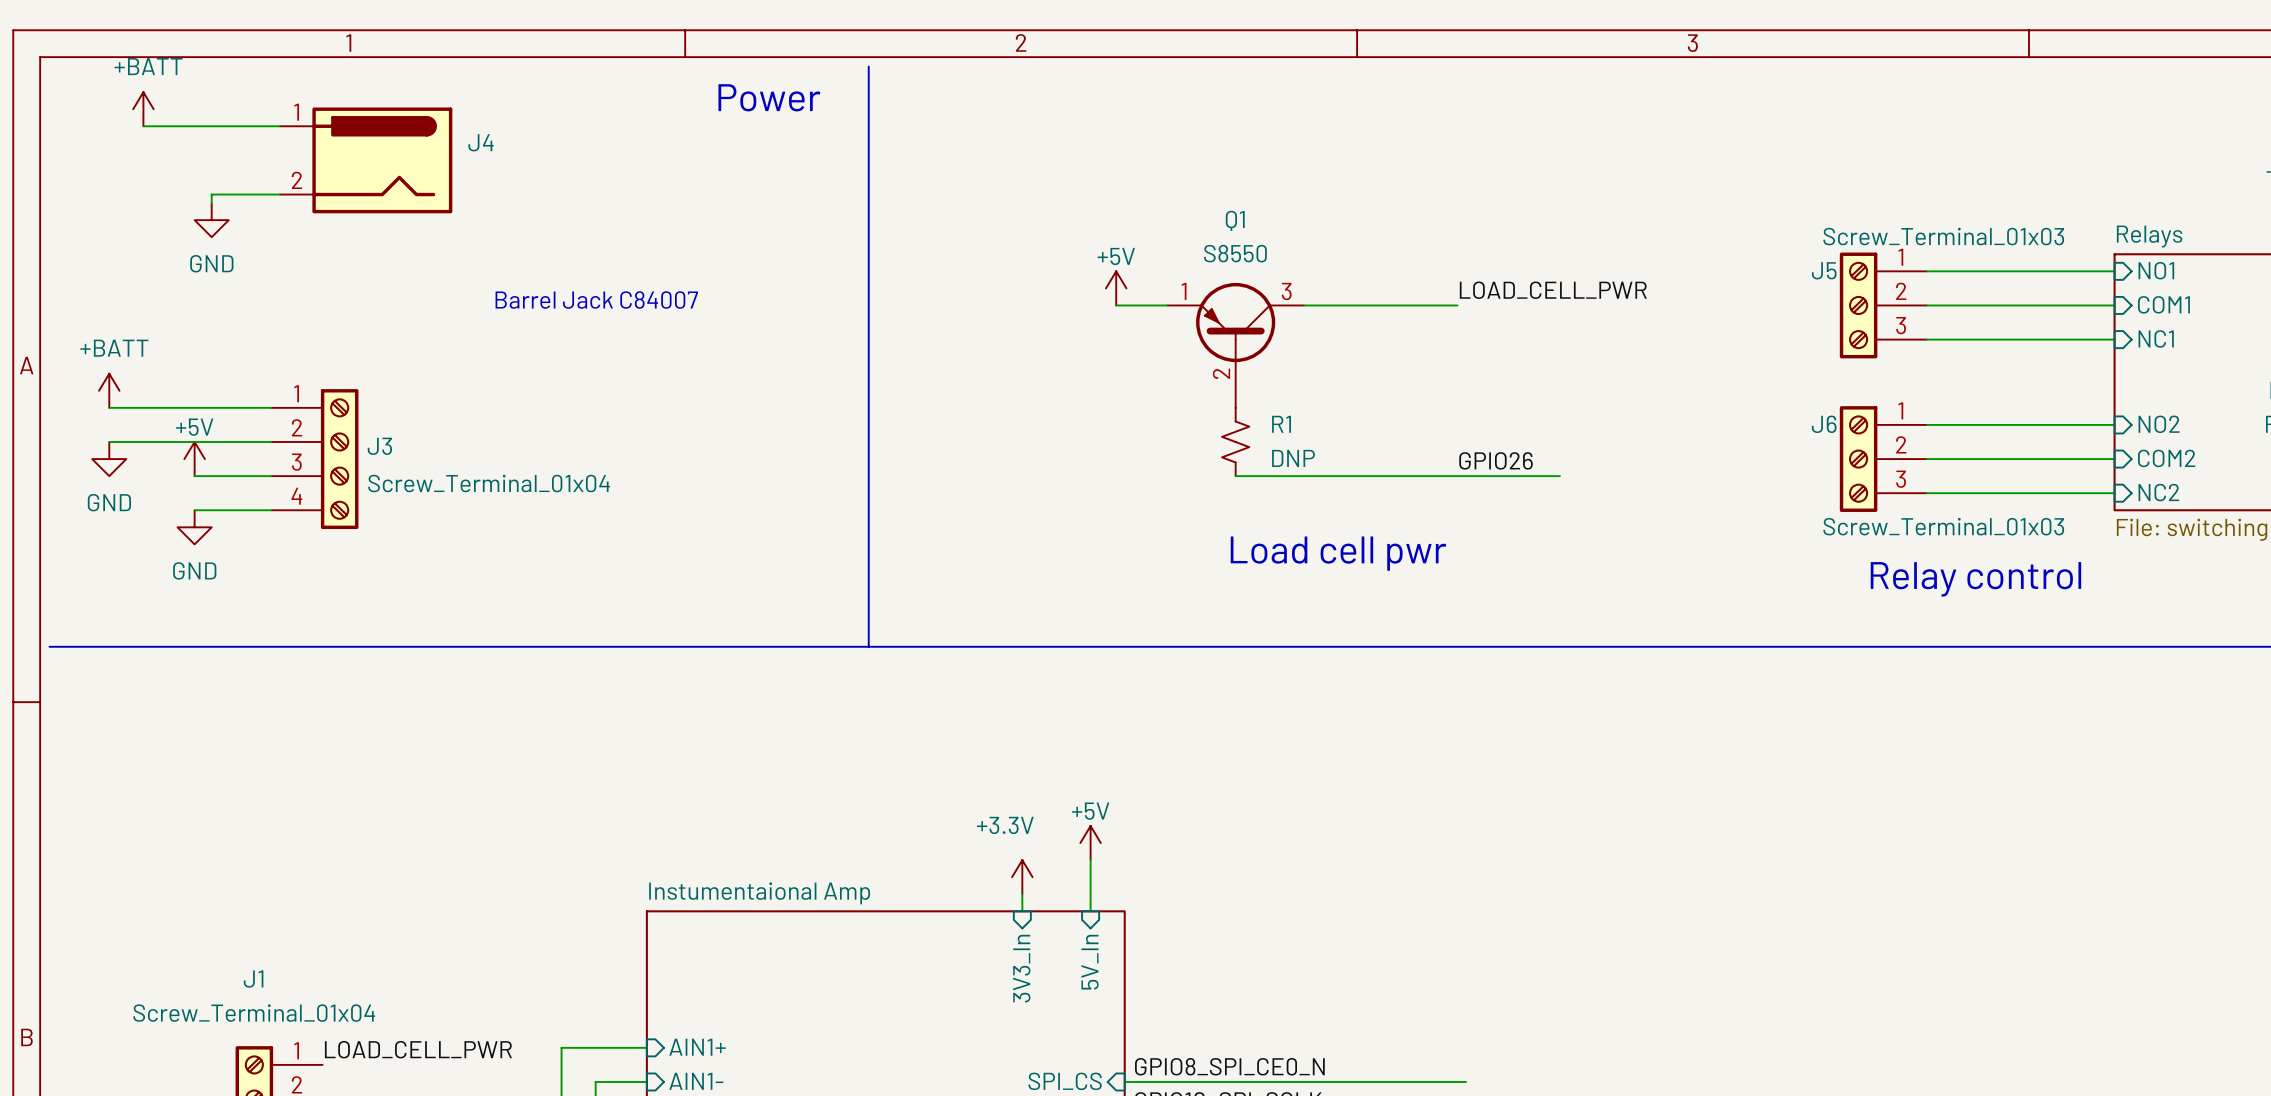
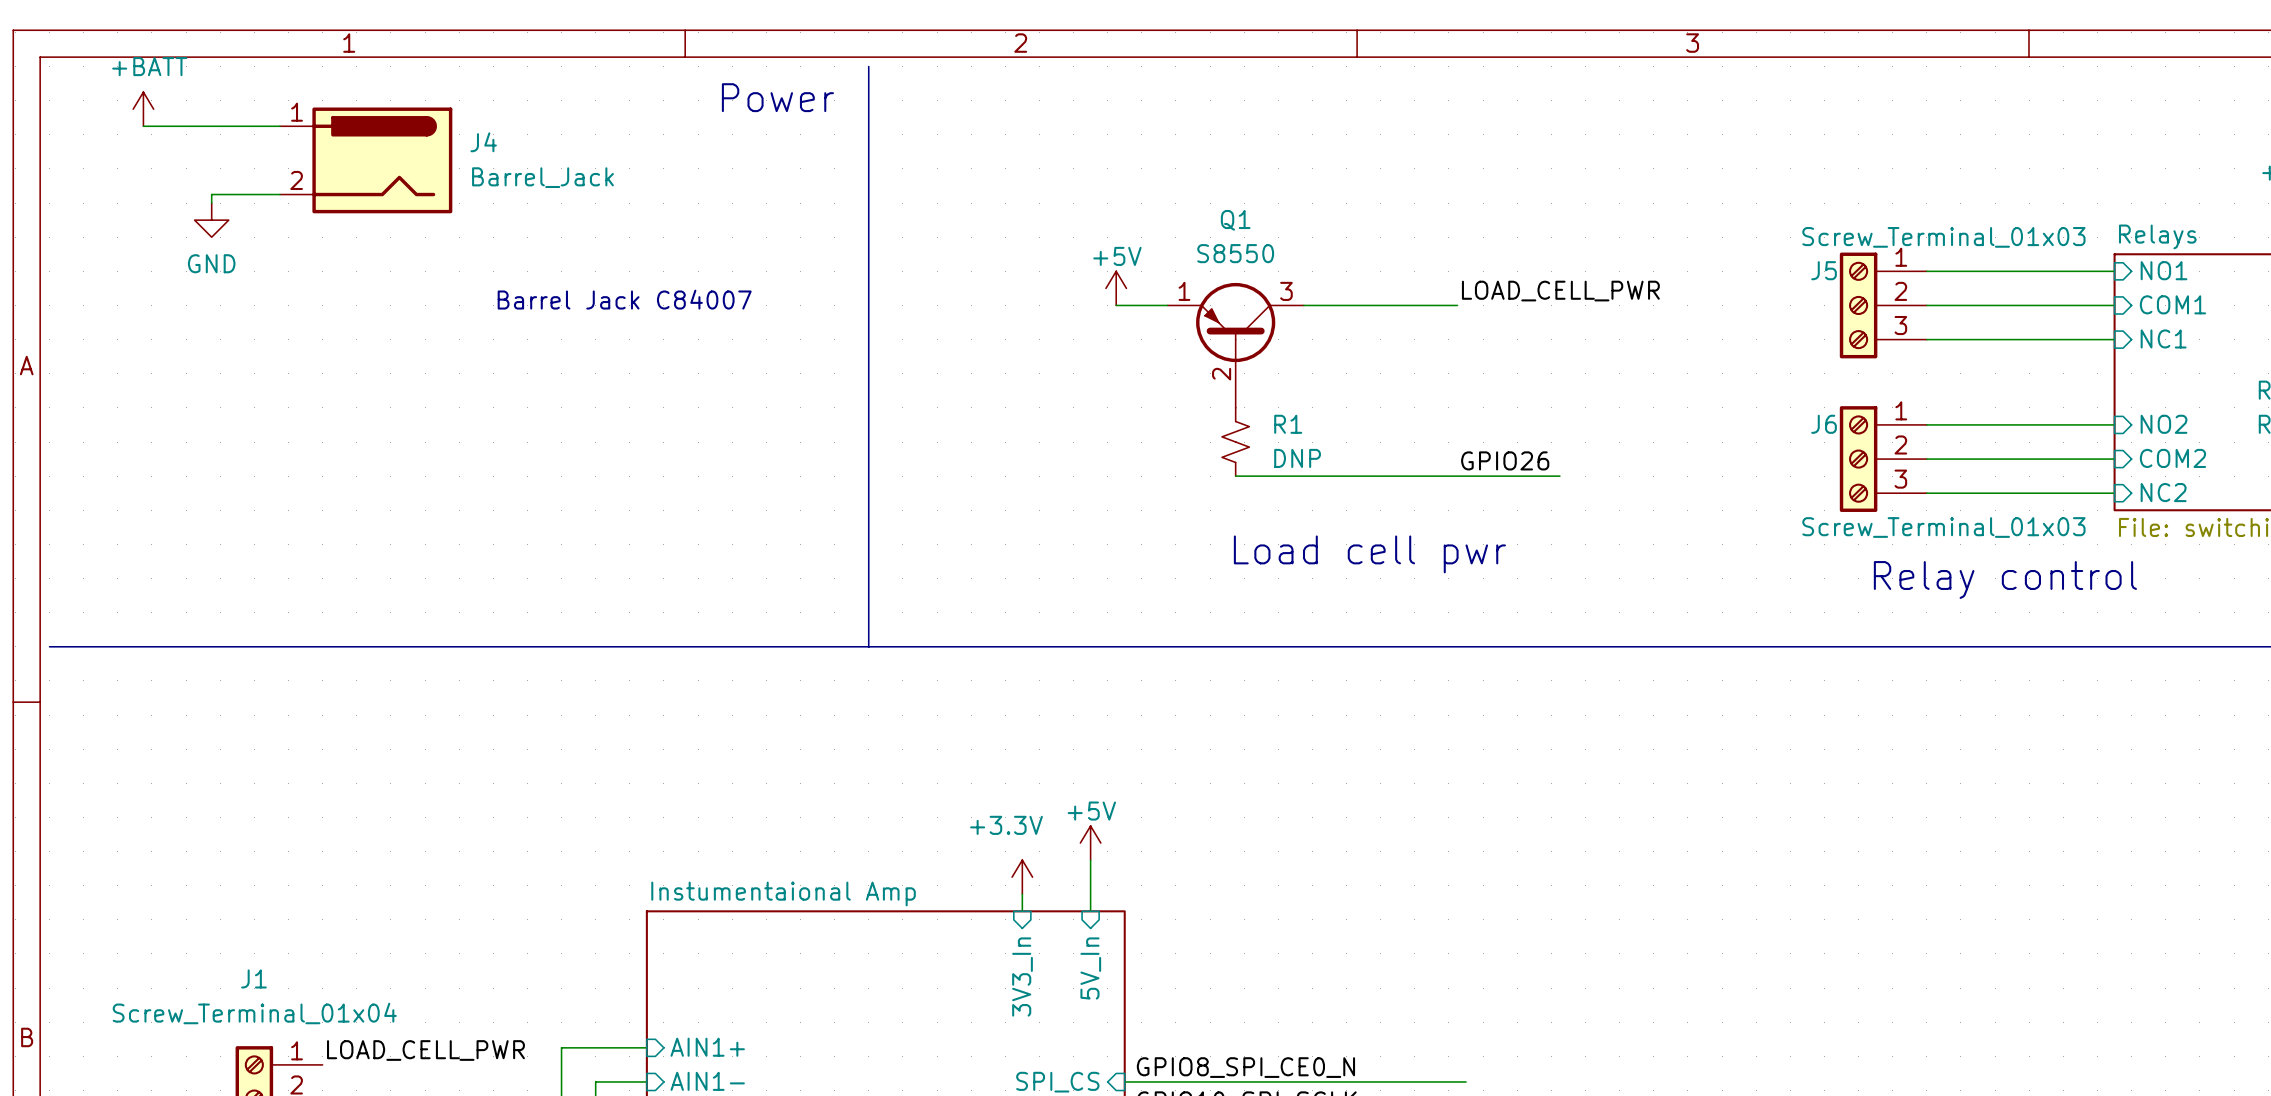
J4 value: none -> Barrel_Jack (542, 177)
power symbol: +BATT (109, 390) -> none
wire: (109, 407) (271, 407) -> none
wire: (109, 442) (271, 442) -> none
power symbol: GND (109, 459) -> none
power symbol: +5V (194, 459) -> none
J3: Screw_Terminal_01x04 (314, 459) -> none
wire: (194, 476) (271, 476) -> none
wire: (194, 510) (271, 510) -> none
power symbol: GND (194, 527) -> none

